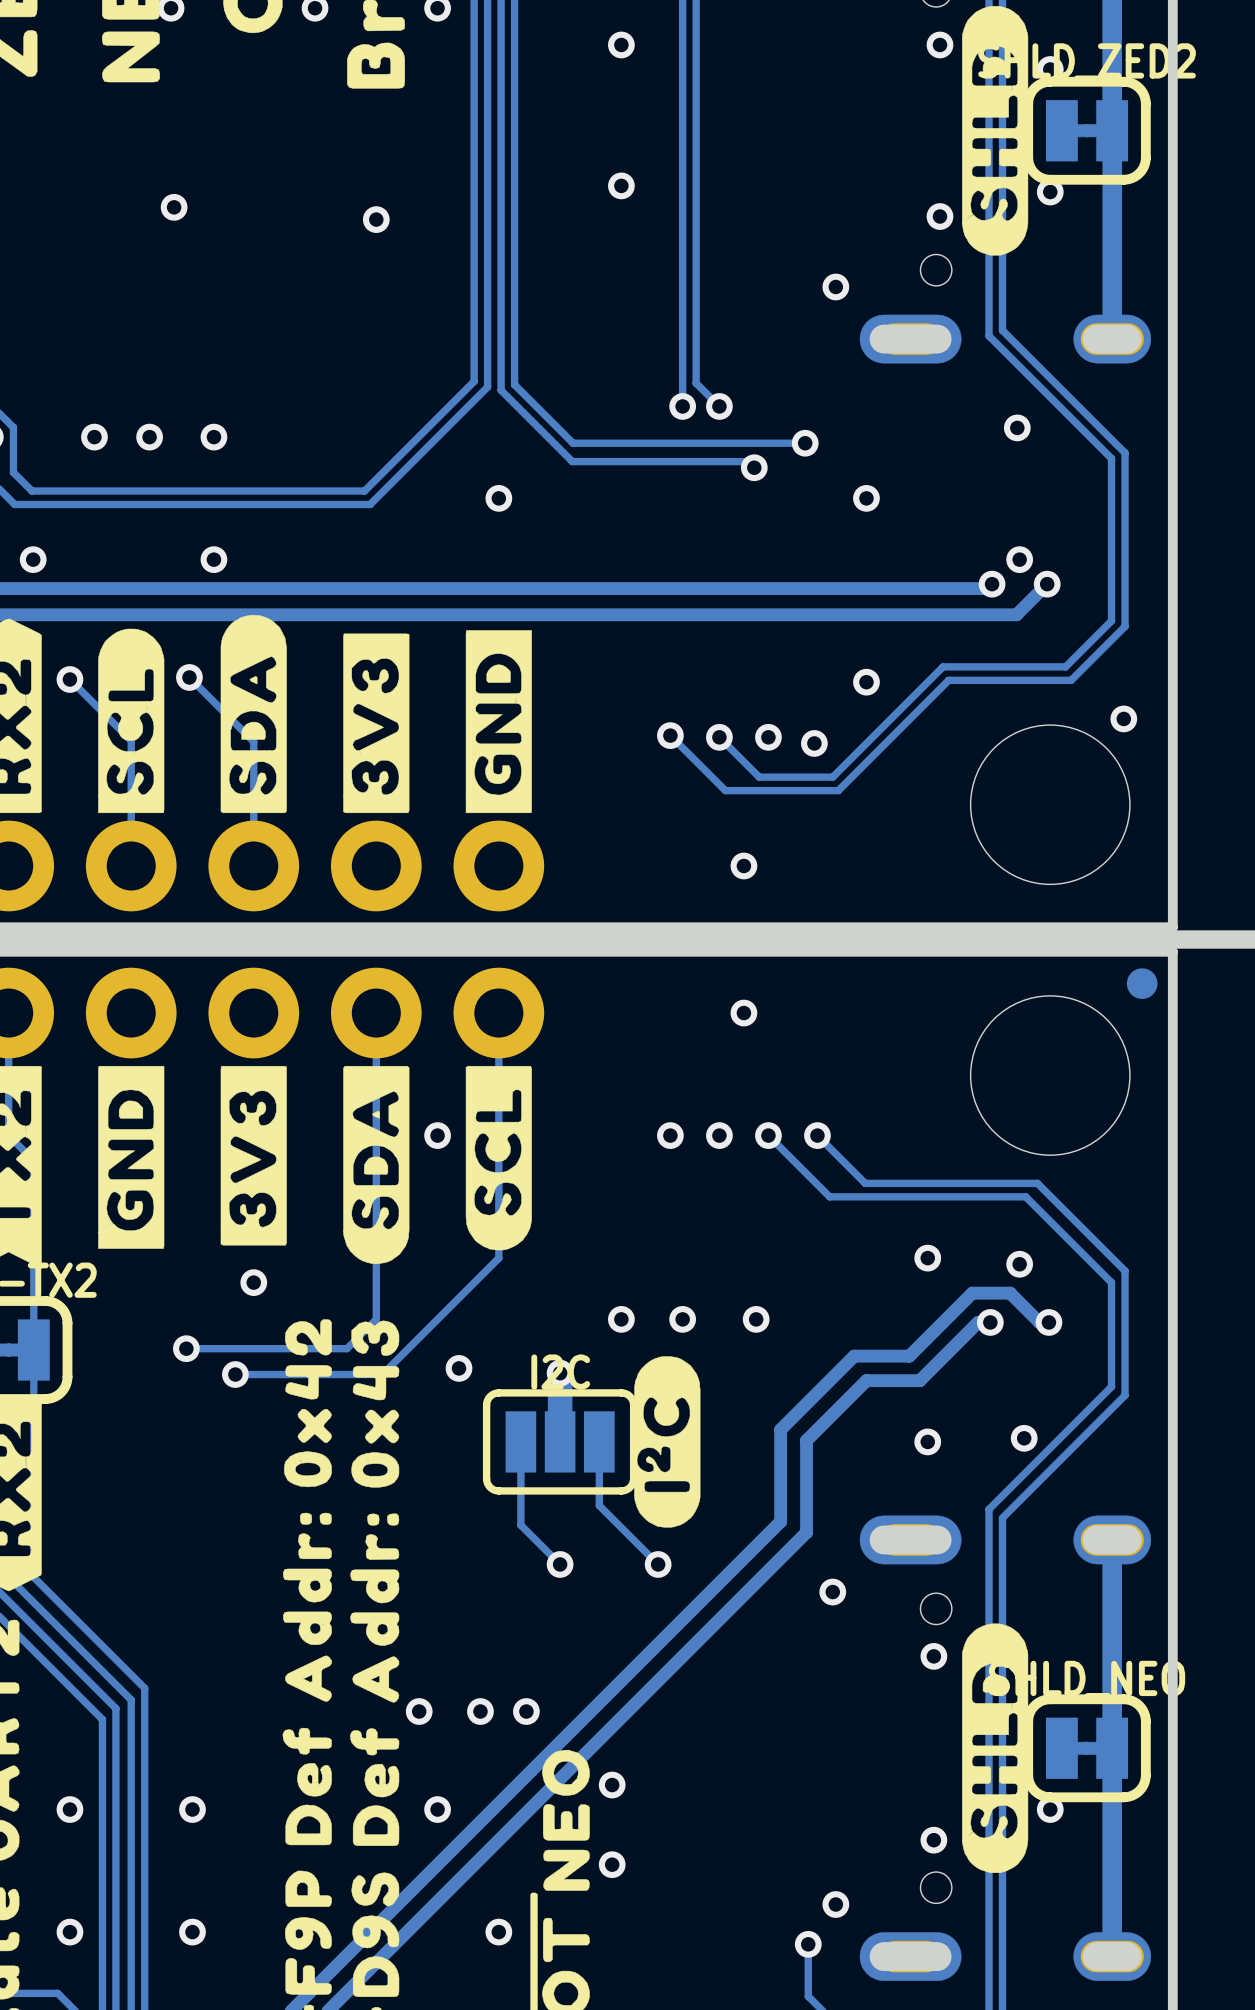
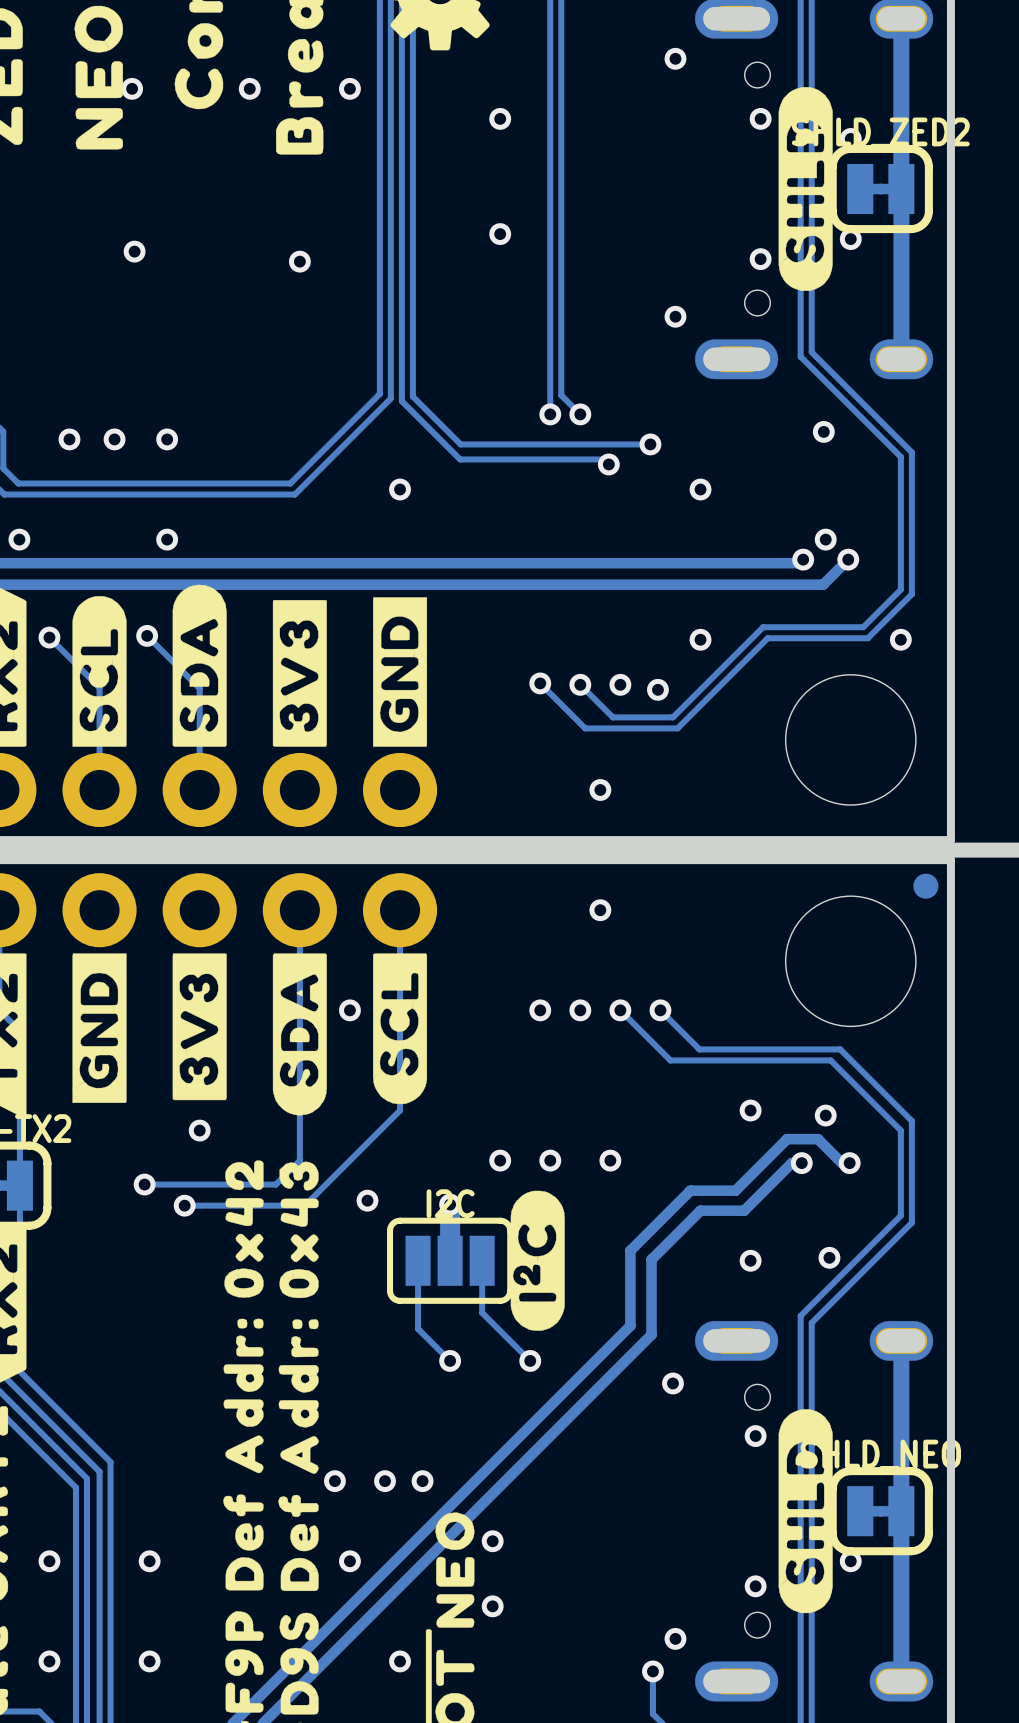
via position: (1123, 718) -> (900, 639)

